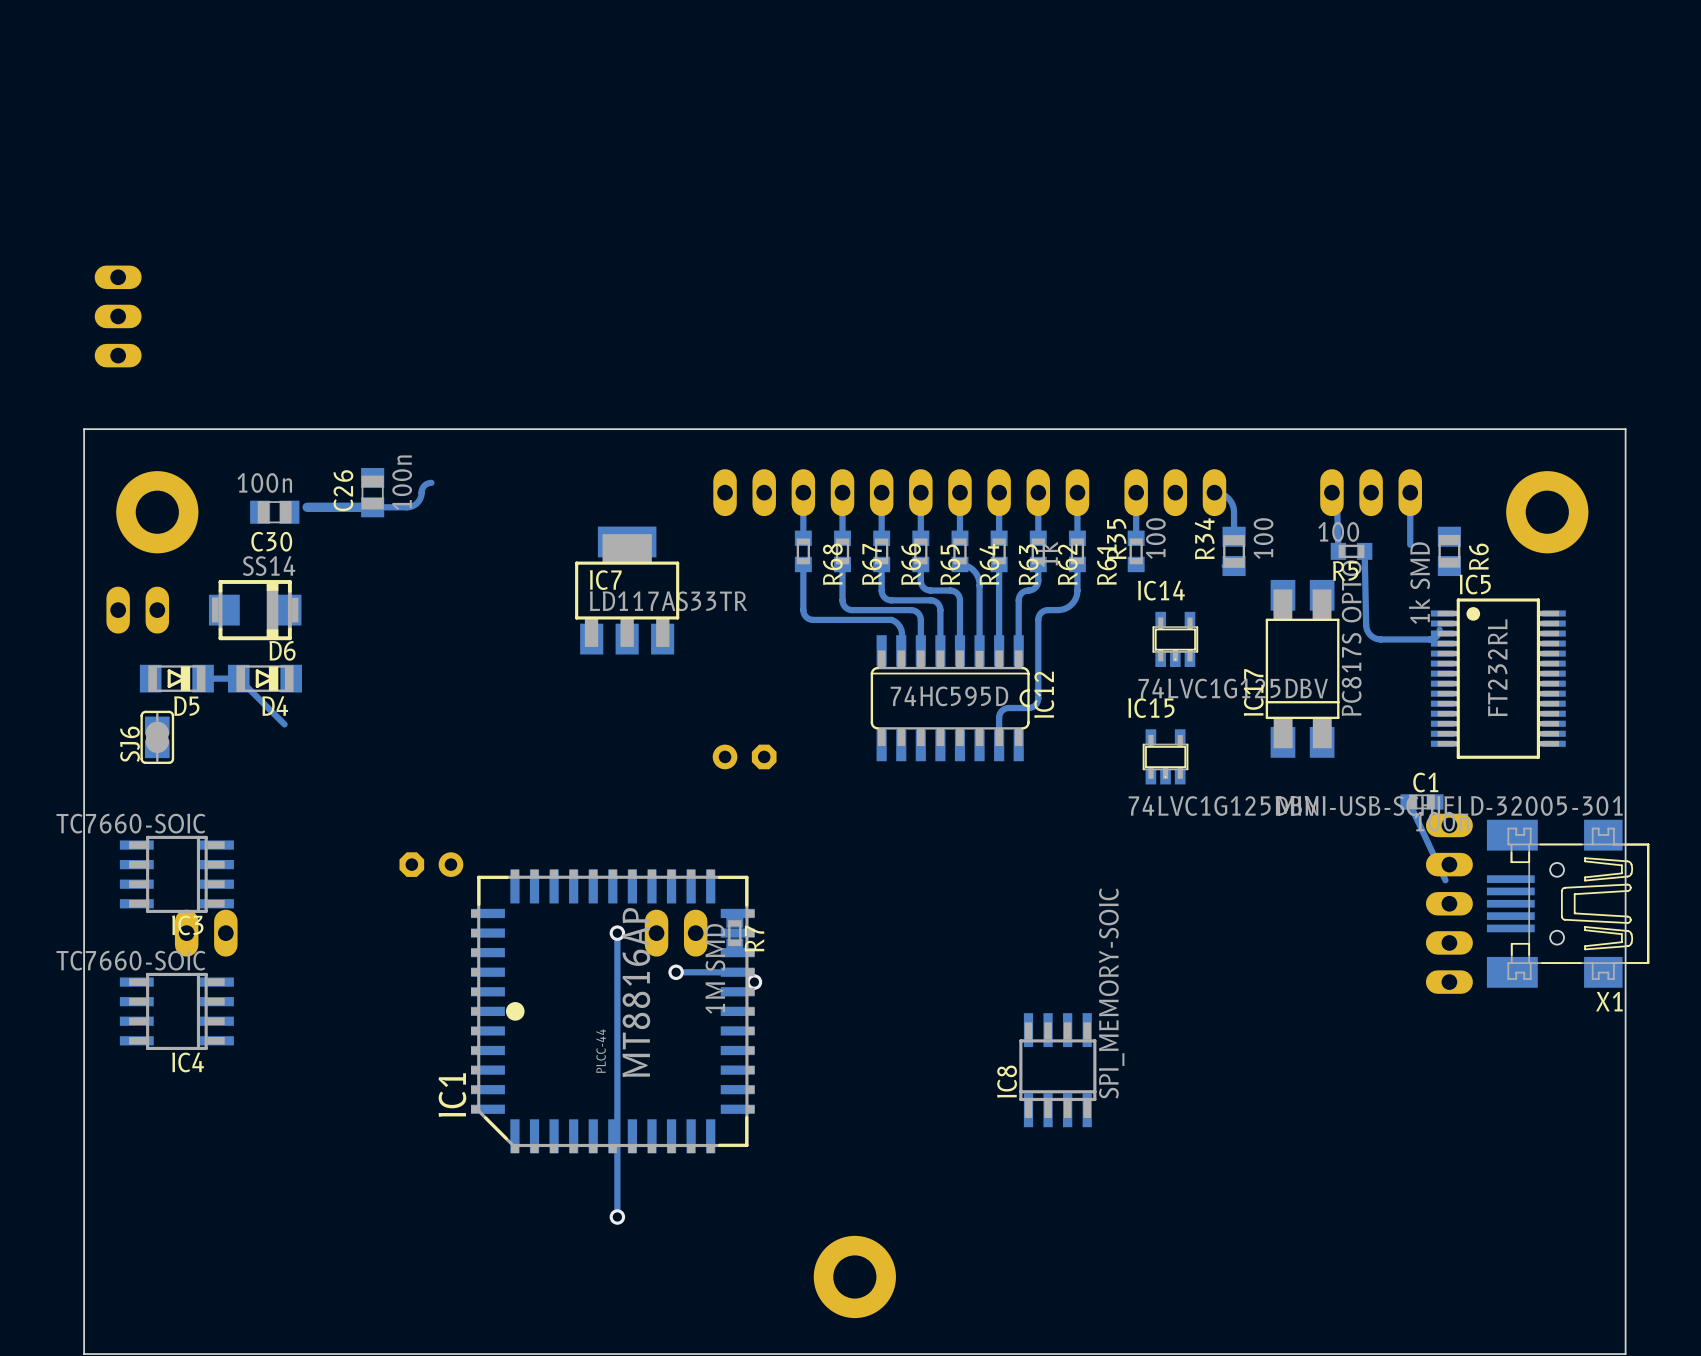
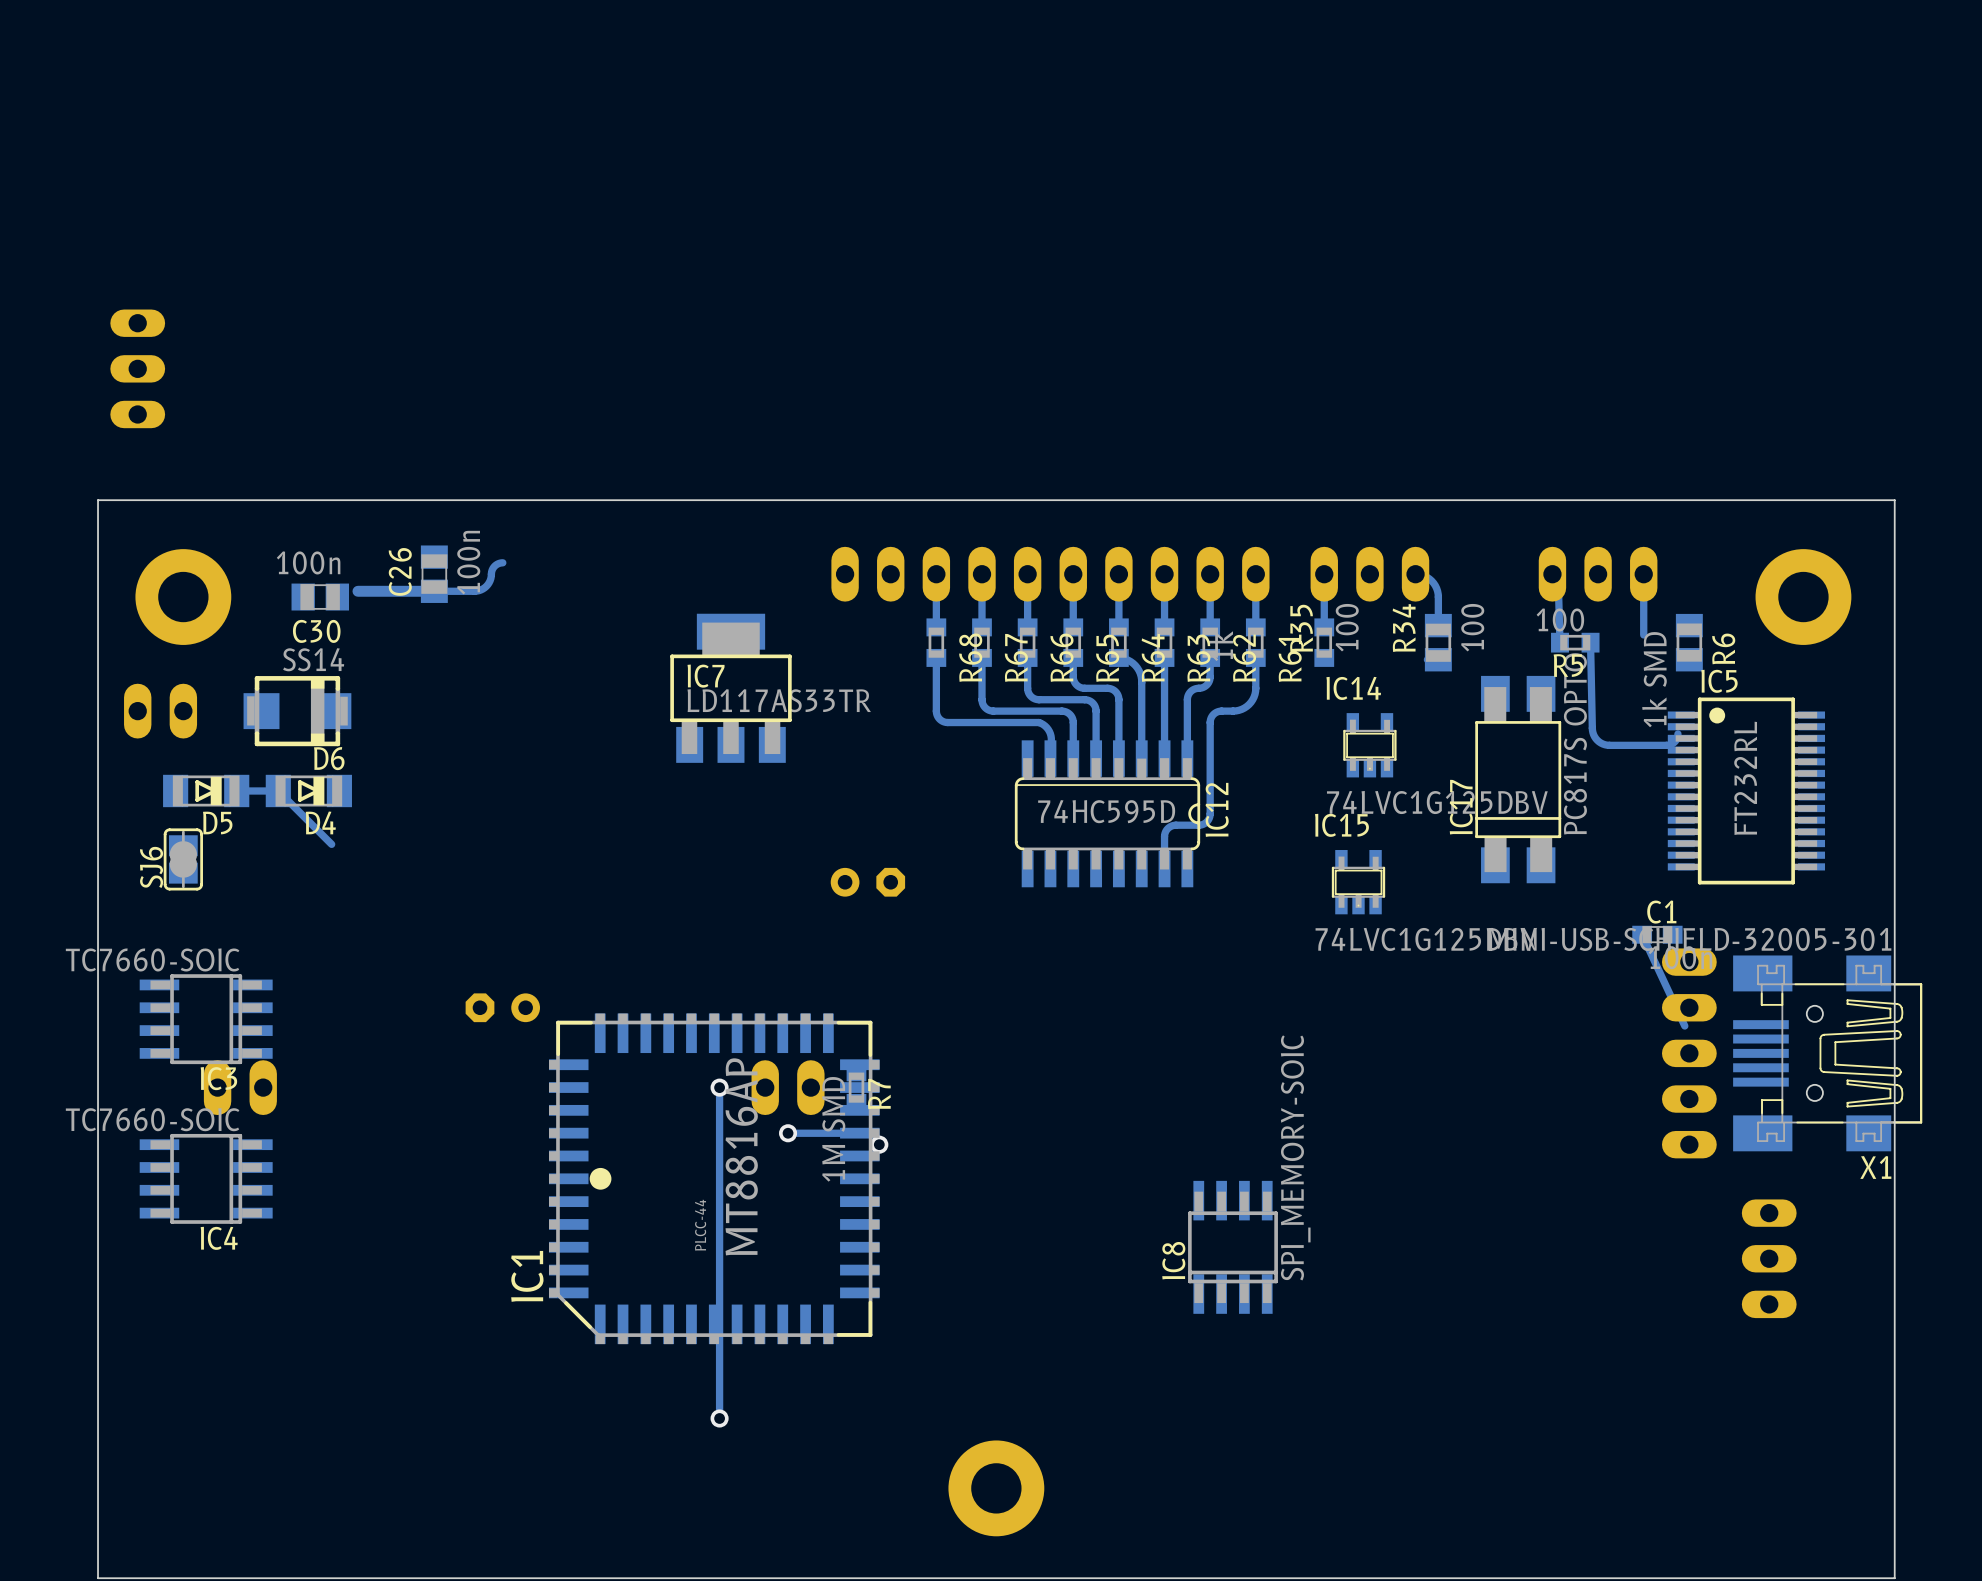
part: none -> (1769, 1258)

